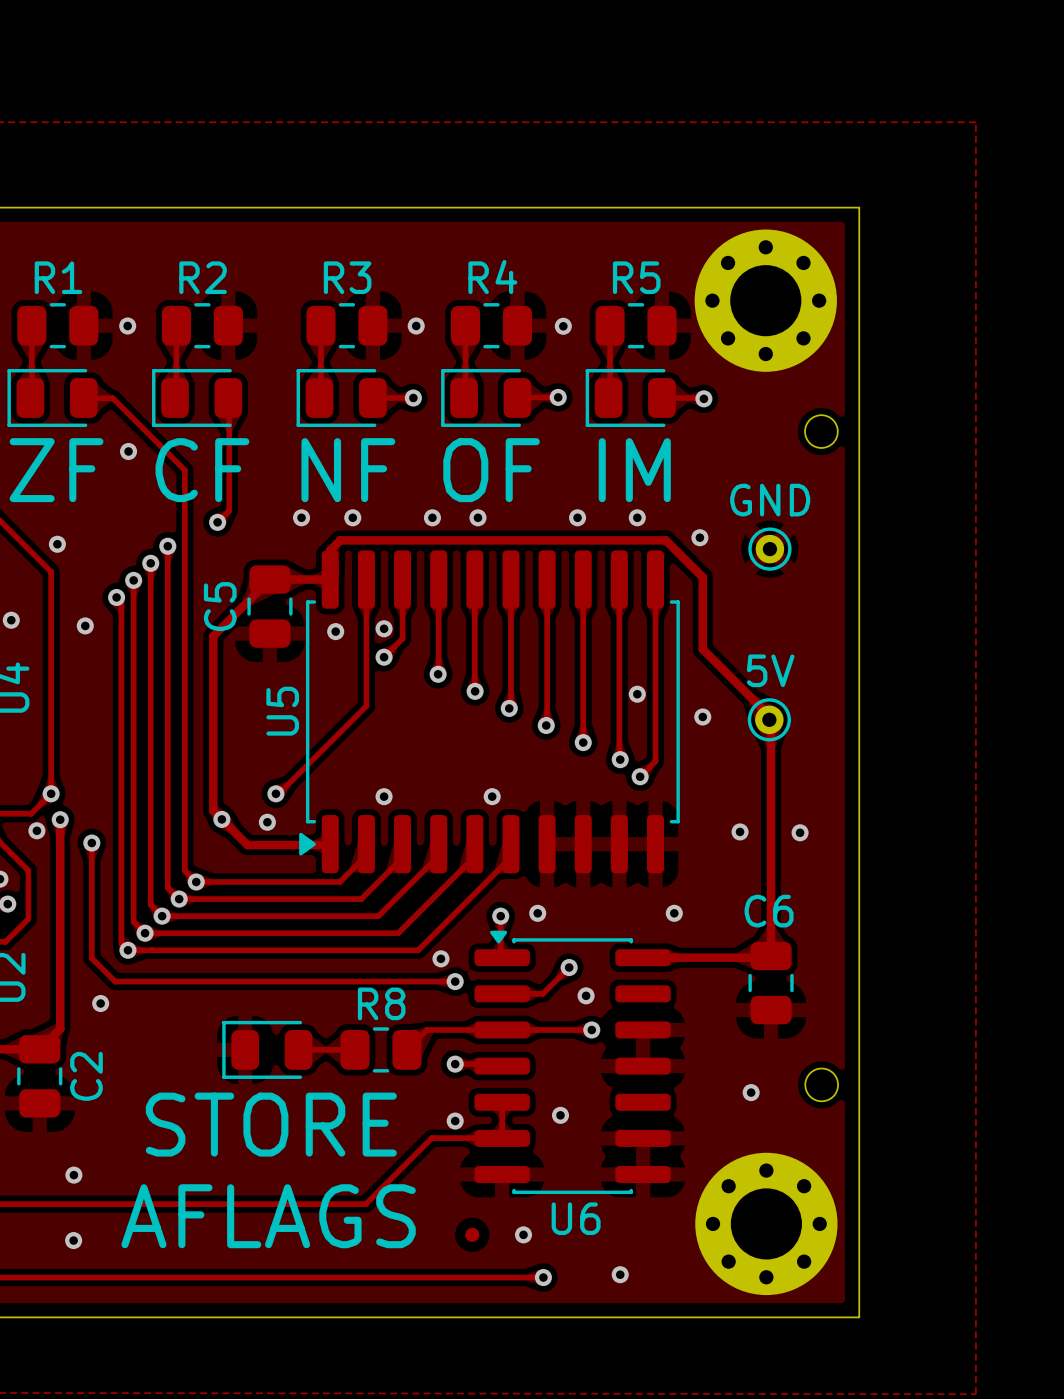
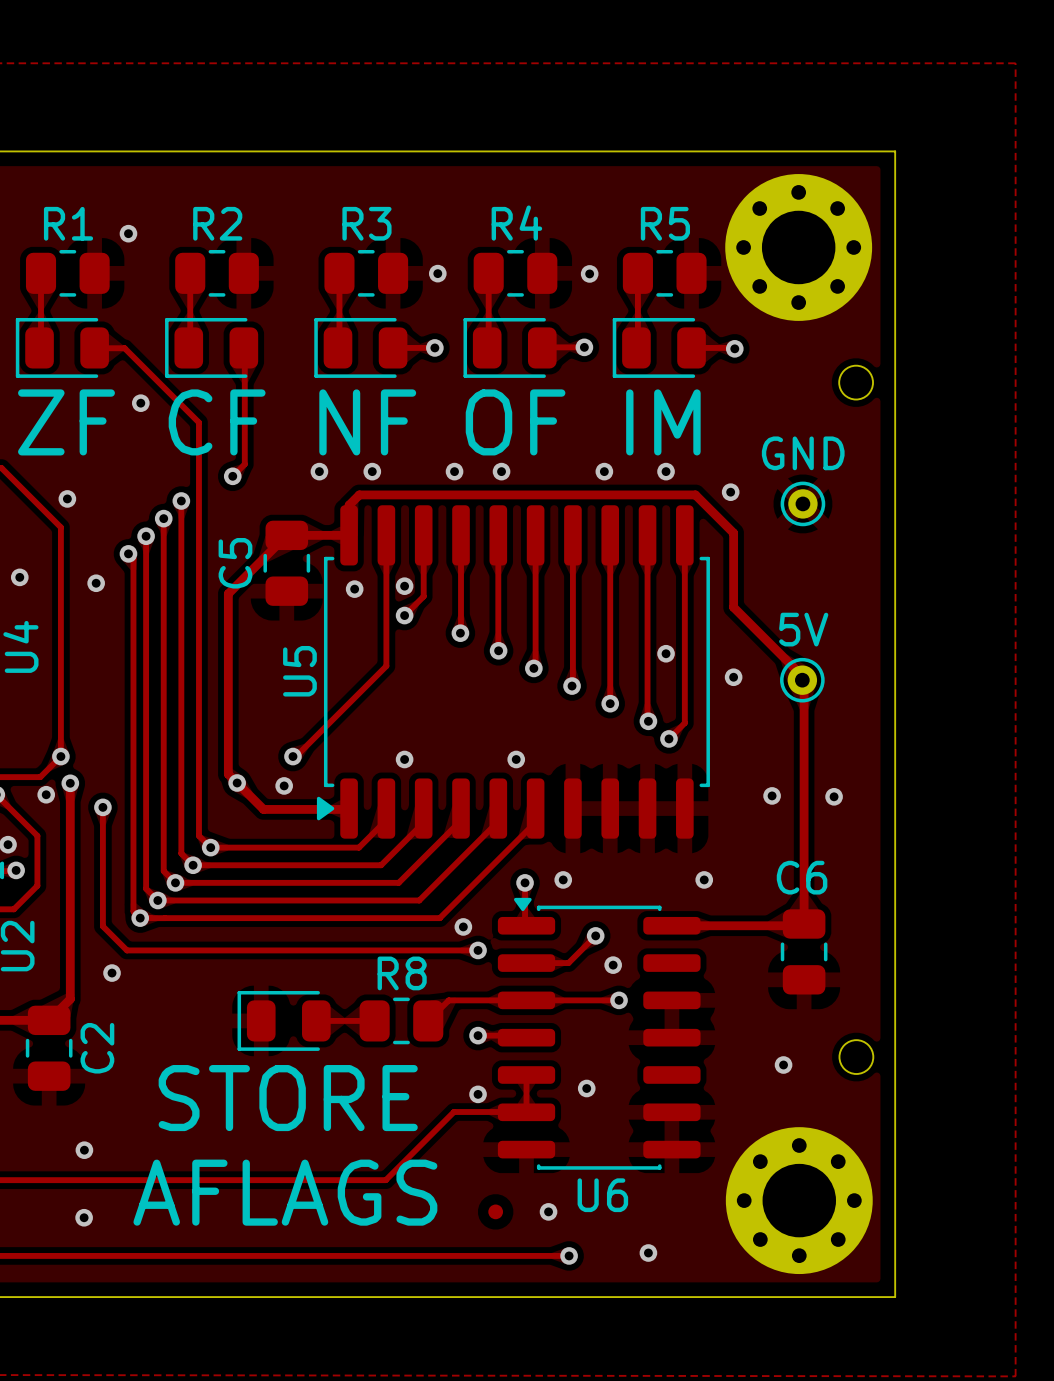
via position: (127, 326) -> (128, 233)

